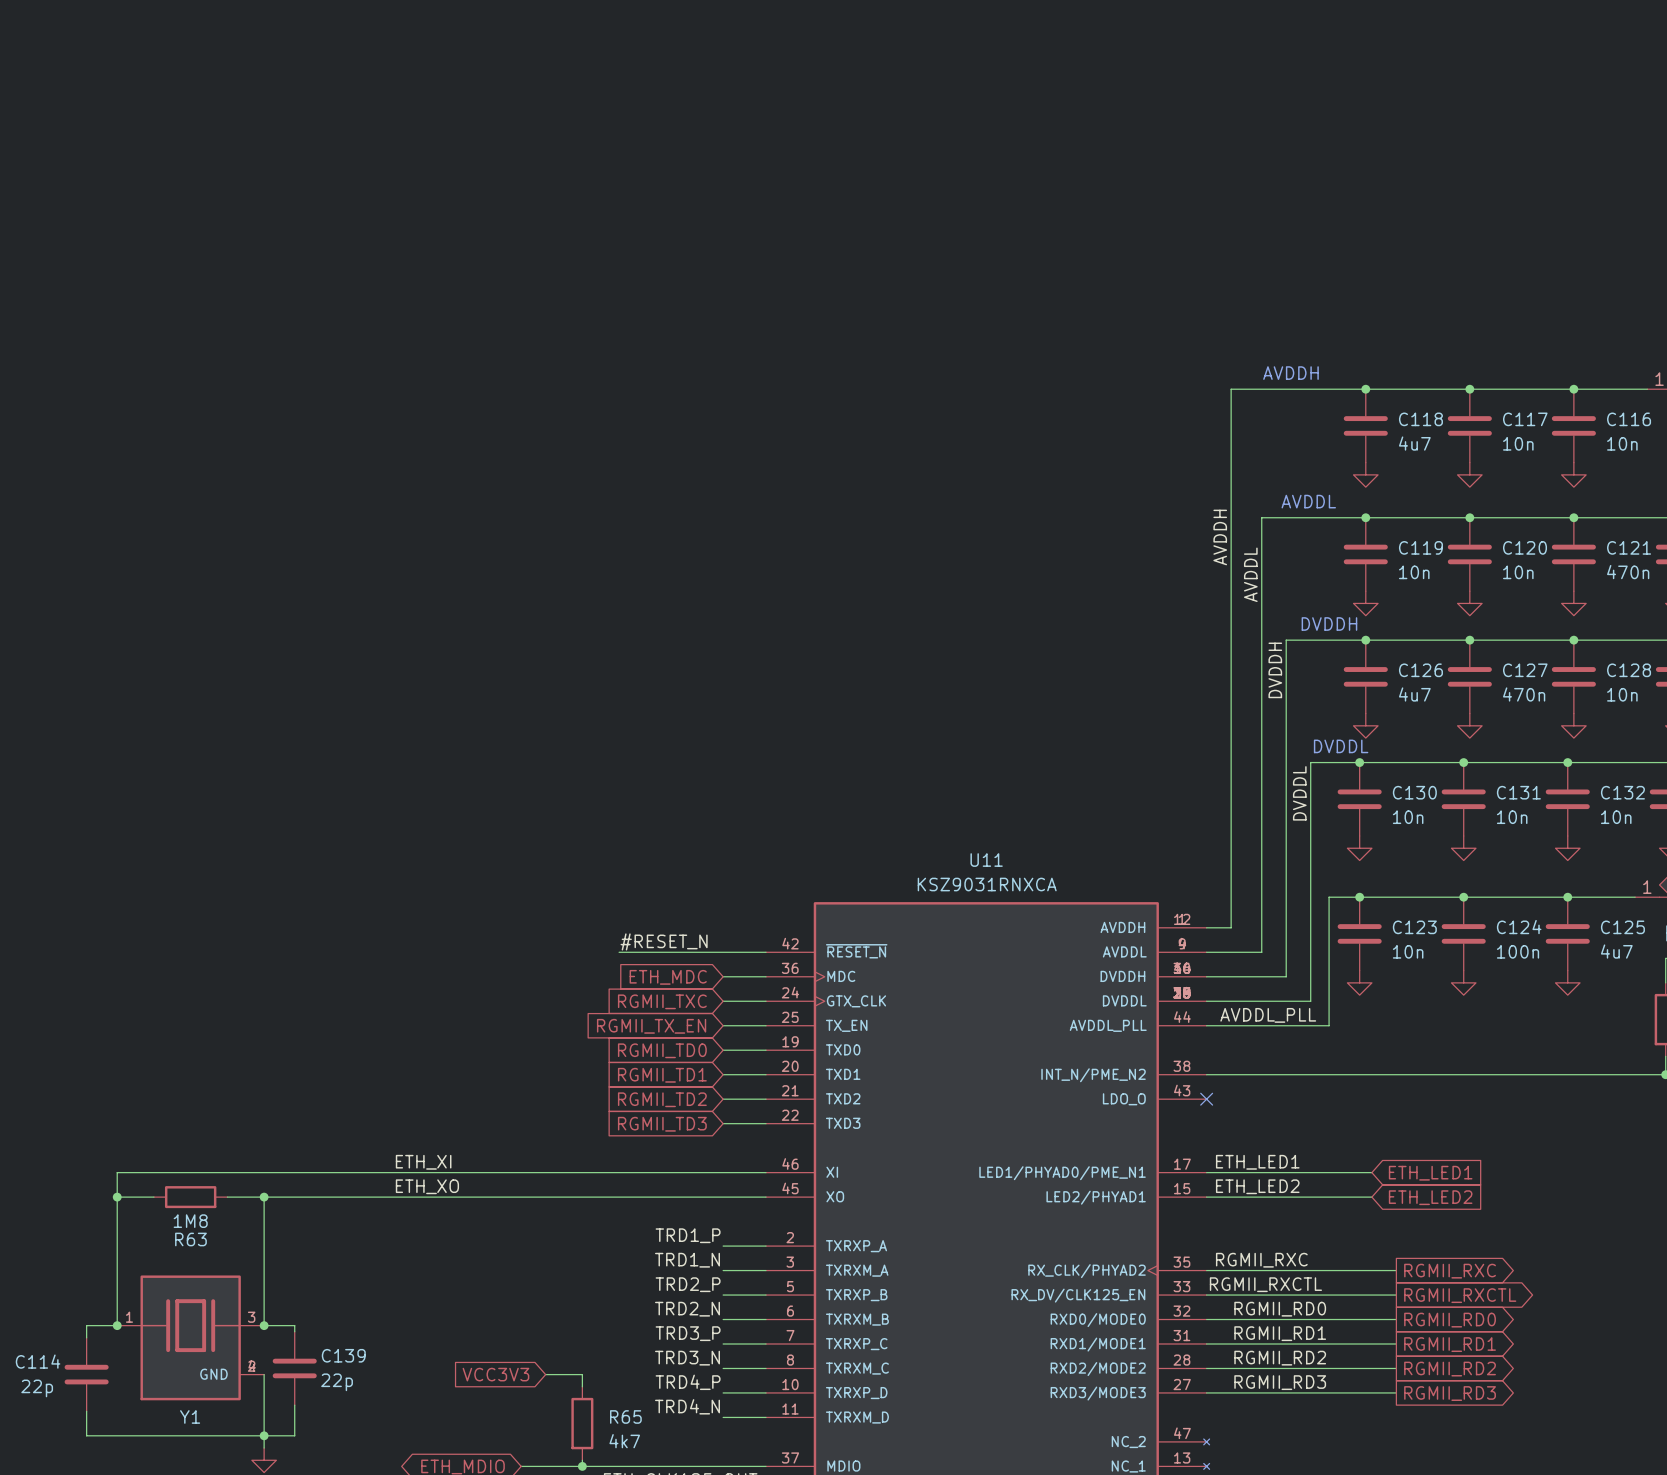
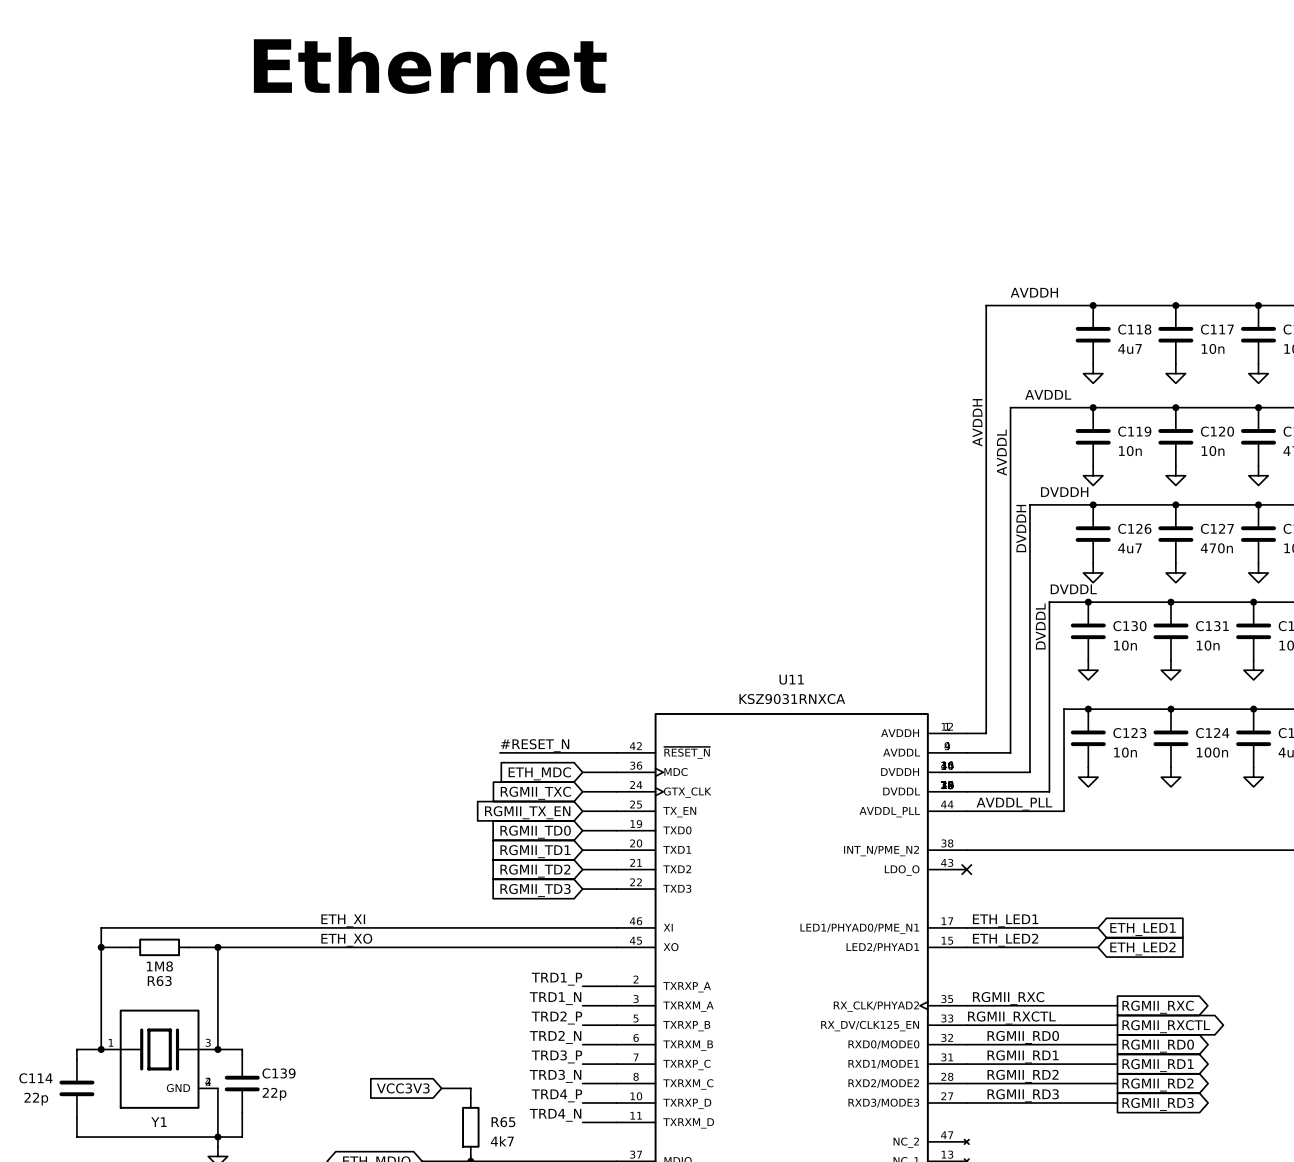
text: none -> Ethernet (430, 65)

